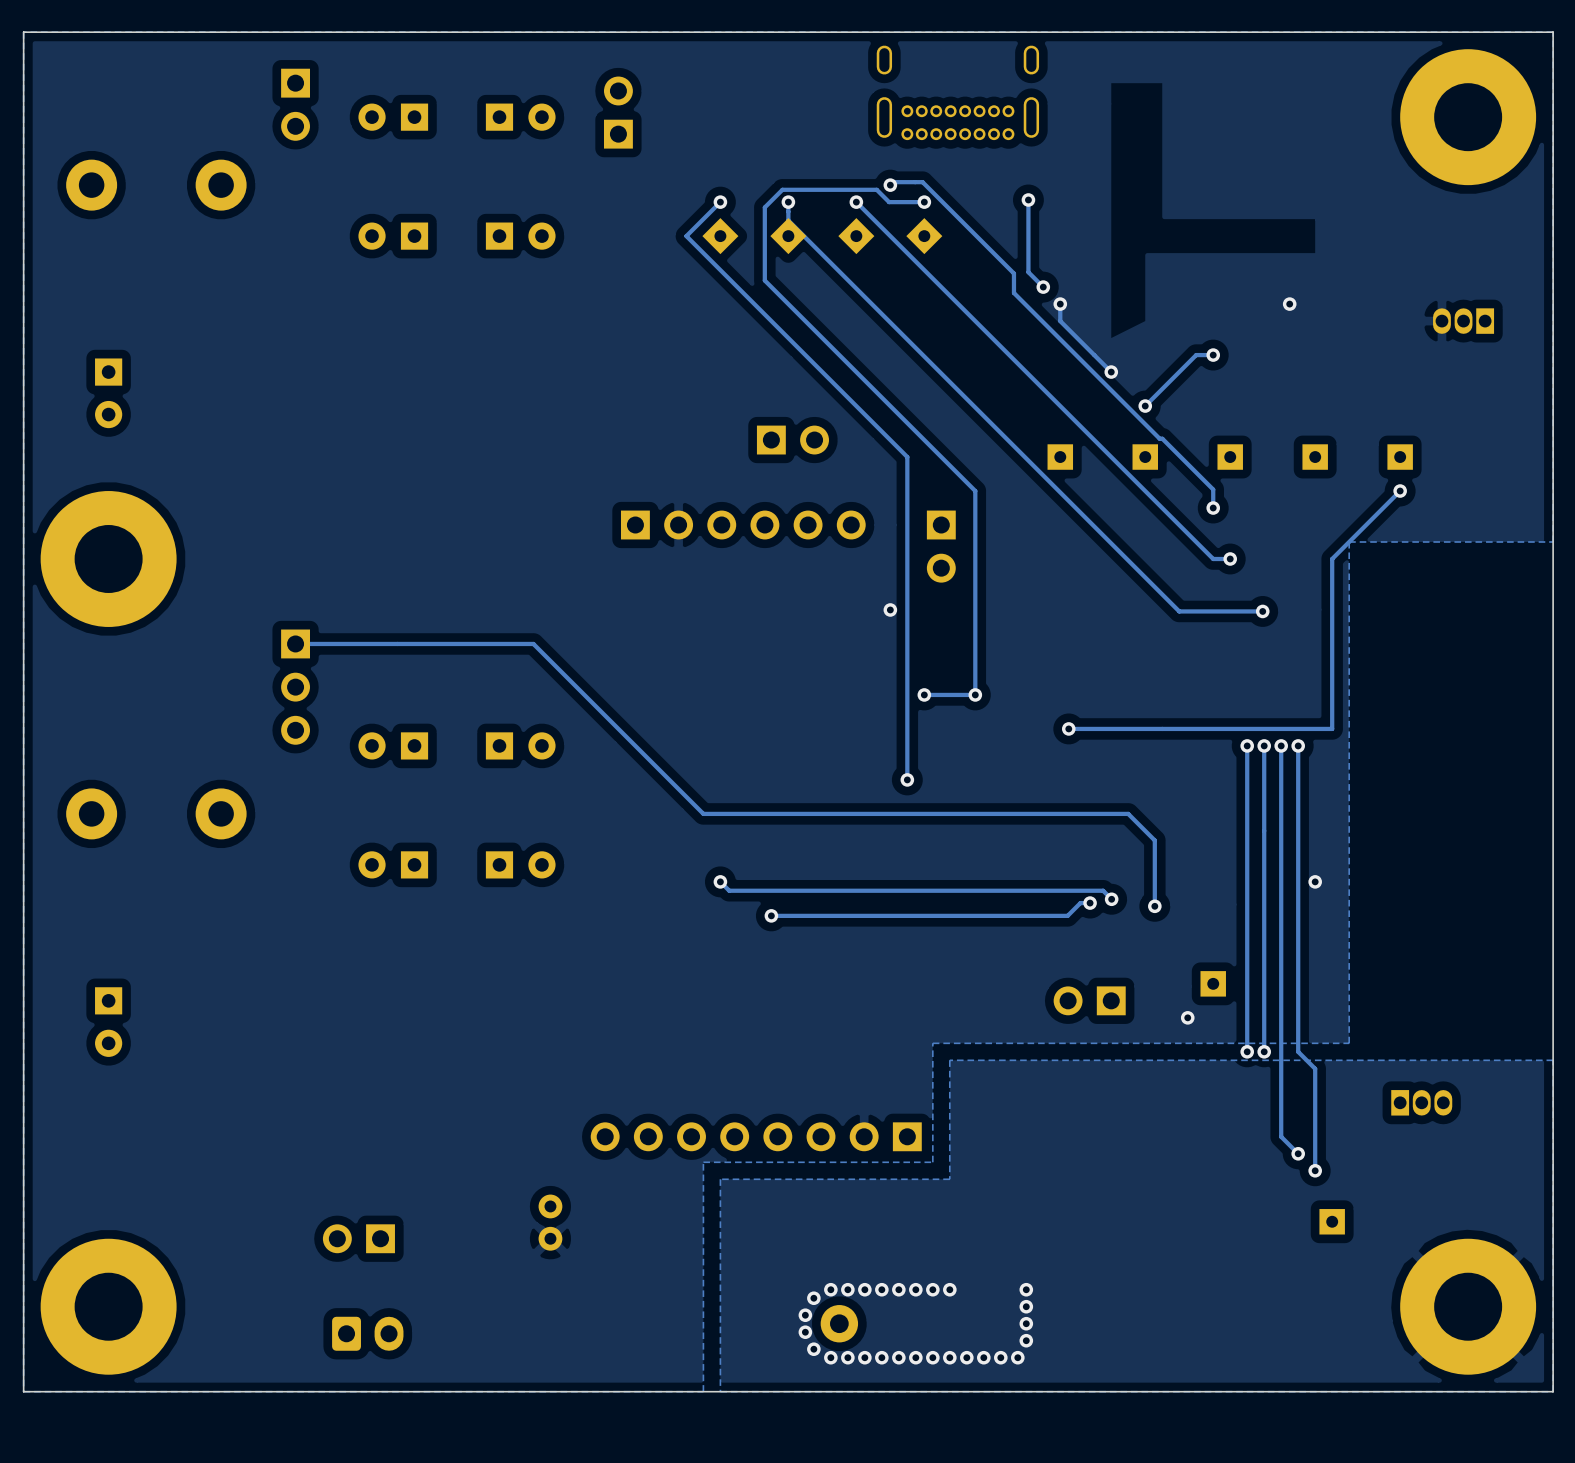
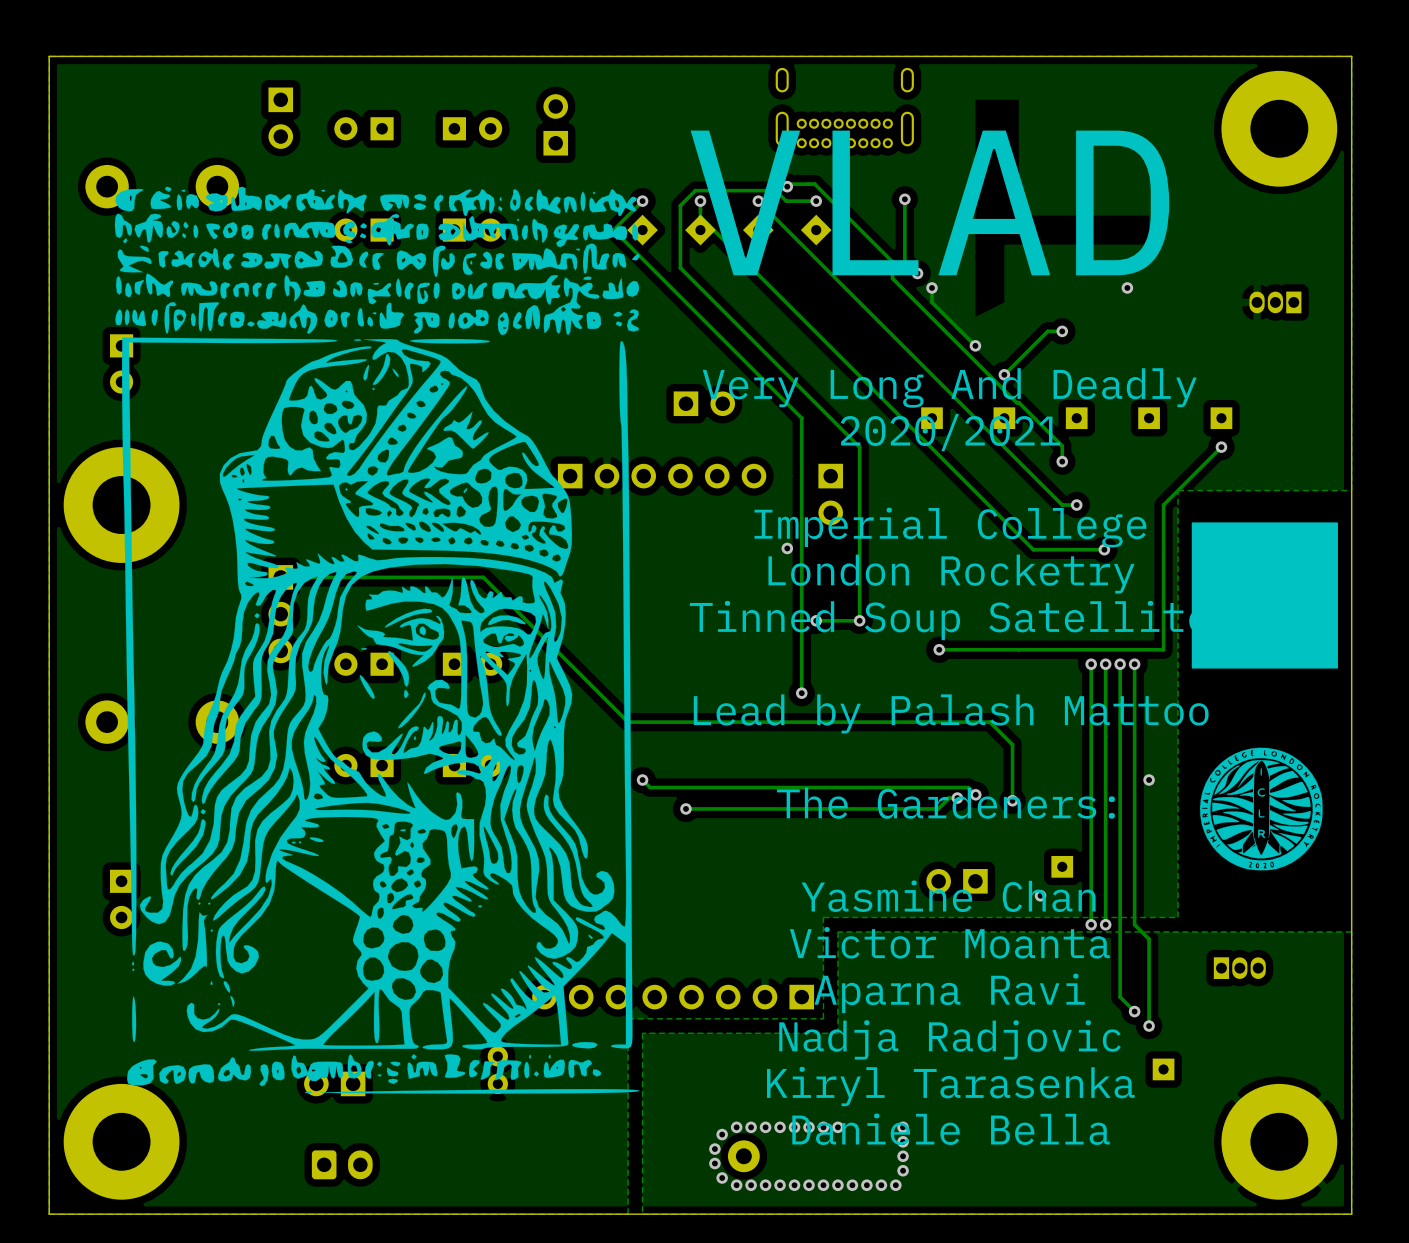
drawing: none -> [114, 186, 640, 1094]
text: none -> VLAD (929, 202)
text: none -> Very Long And Deadly (949, 387)
text: none -> 2020/2021 (950, 432)
drawing: none -> [1191, 522, 1338, 669]
text: none -> Imperial College (950, 527)
text: none -> London Rocketry (951, 574)
text: none -> Tinned Soup Satellite (949, 620)
text: none -> Lead by Palash Mattoo (951, 713)
drawing: none -> [1200, 747, 1323, 871]
text: none -> The Gardeners: (945, 803)
text: none -> Yasmine Chan (948, 896)
text: none -> Victor Moanta (949, 942)
text: none -> Aparna Ravi (949, 993)
text: none -> Nadja Radjovic (950, 1039)
text: none -> Kiryl Tarasenka (950, 1086)
text: none -> Daniele Bella (951, 1129)

